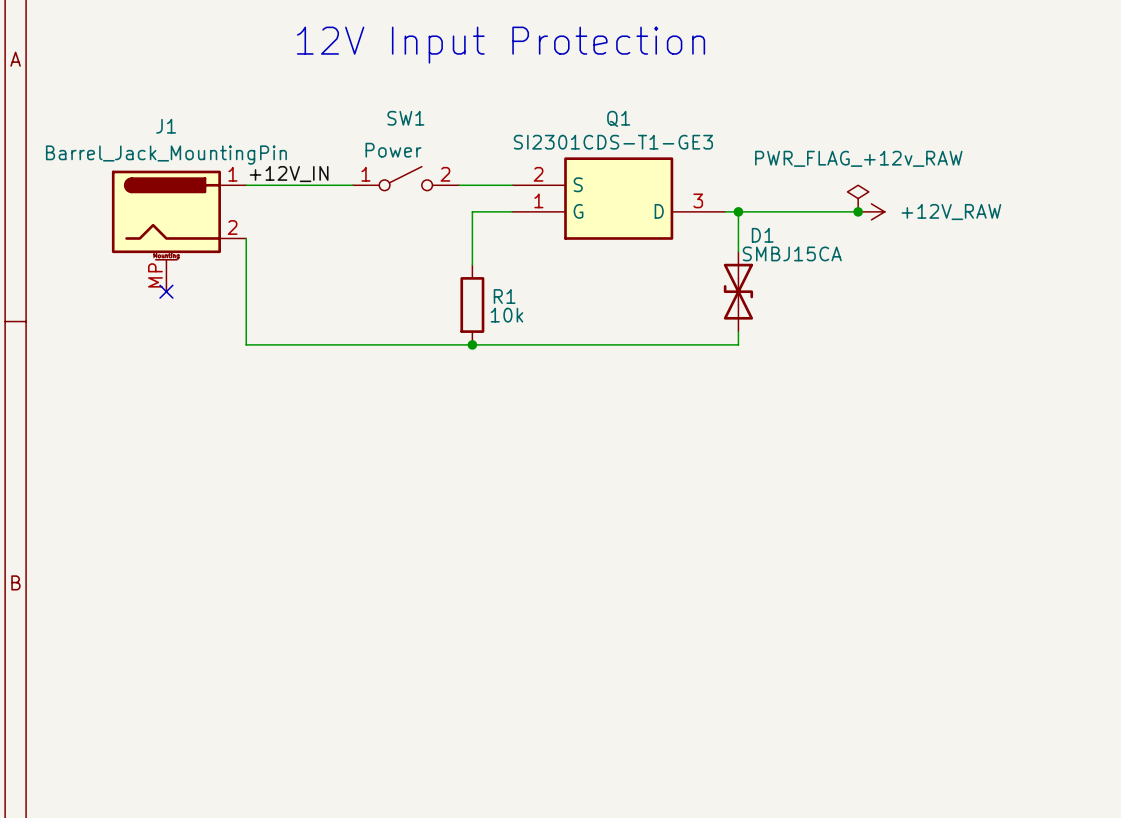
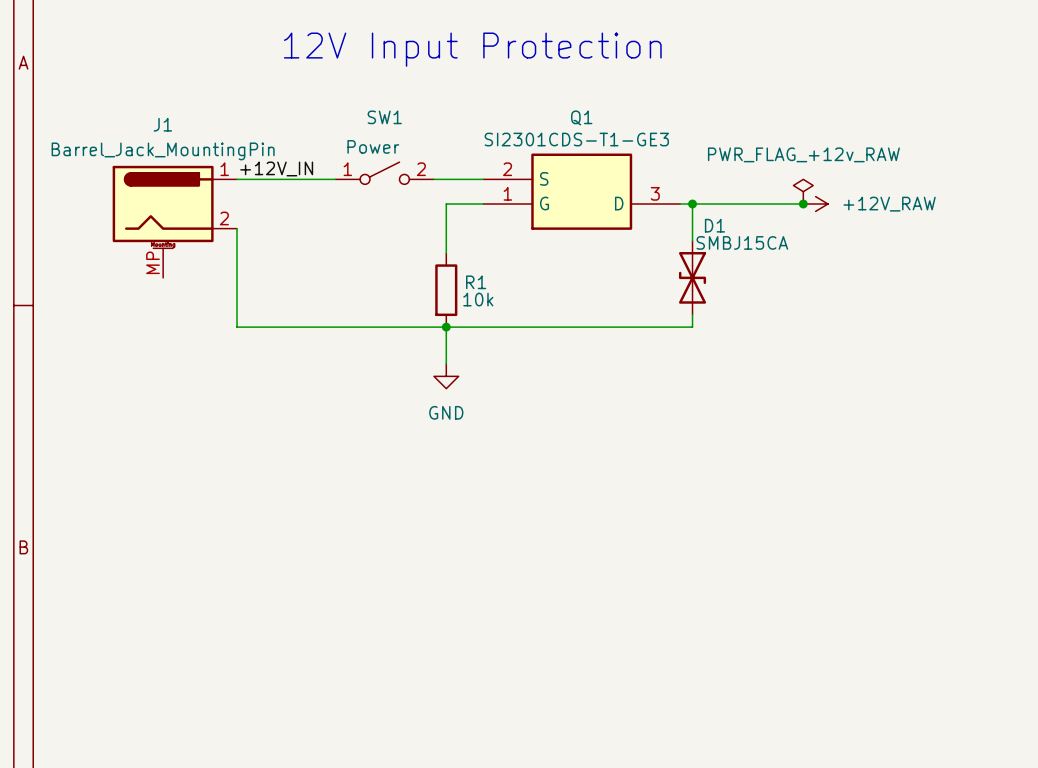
no-connect mark: (166, 291) -> none
wire: none -> (446, 327) (446, 364)
power symbol: none -> GND (446, 376)

